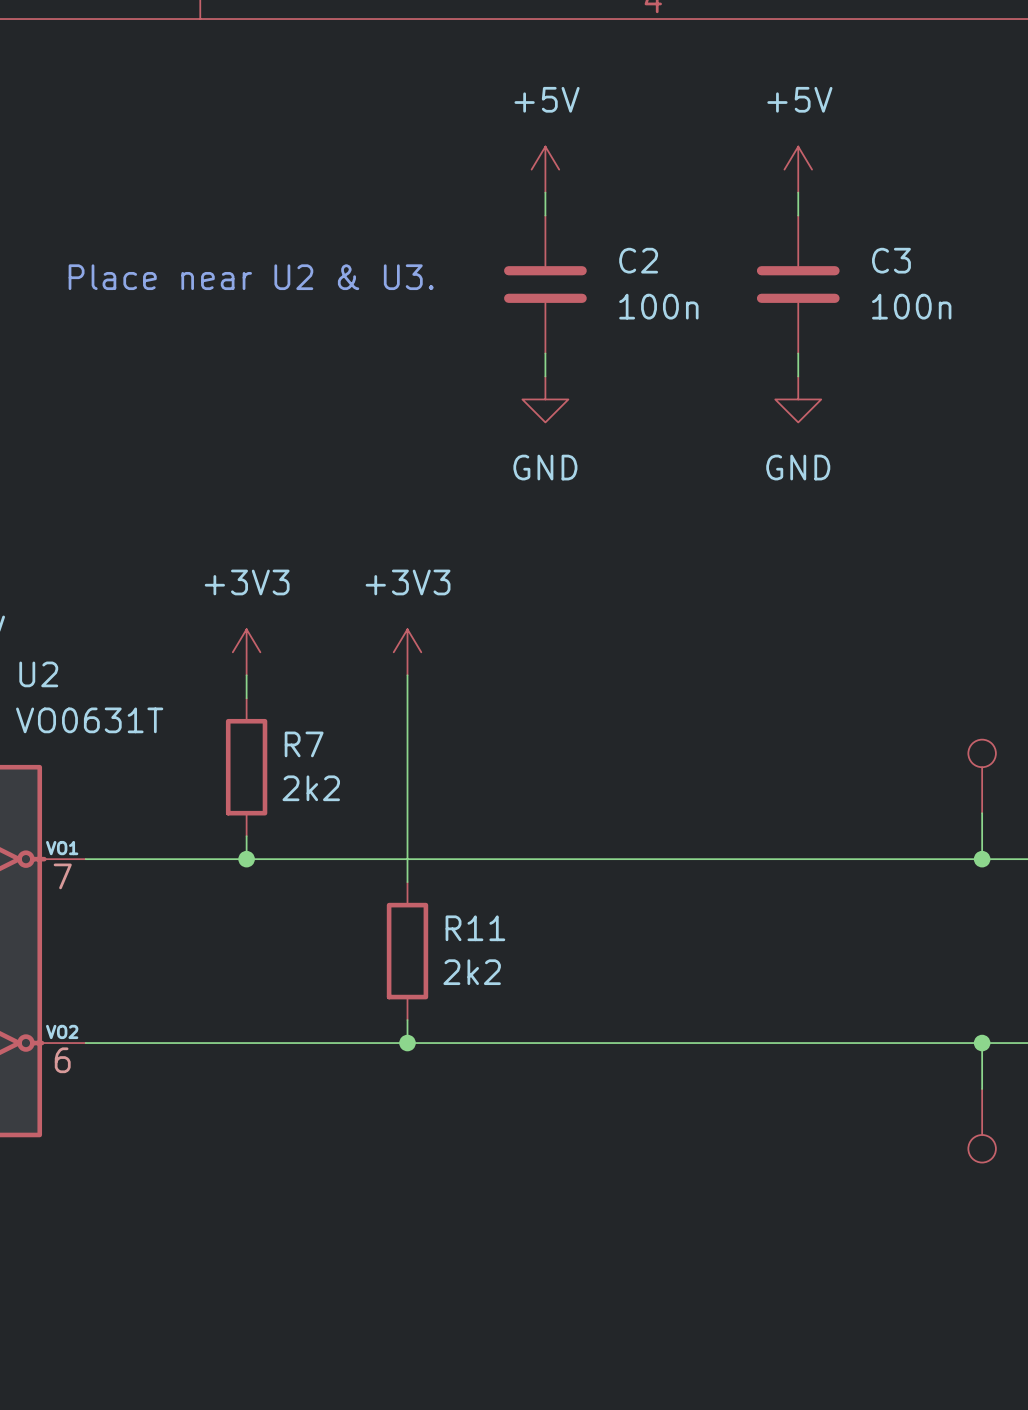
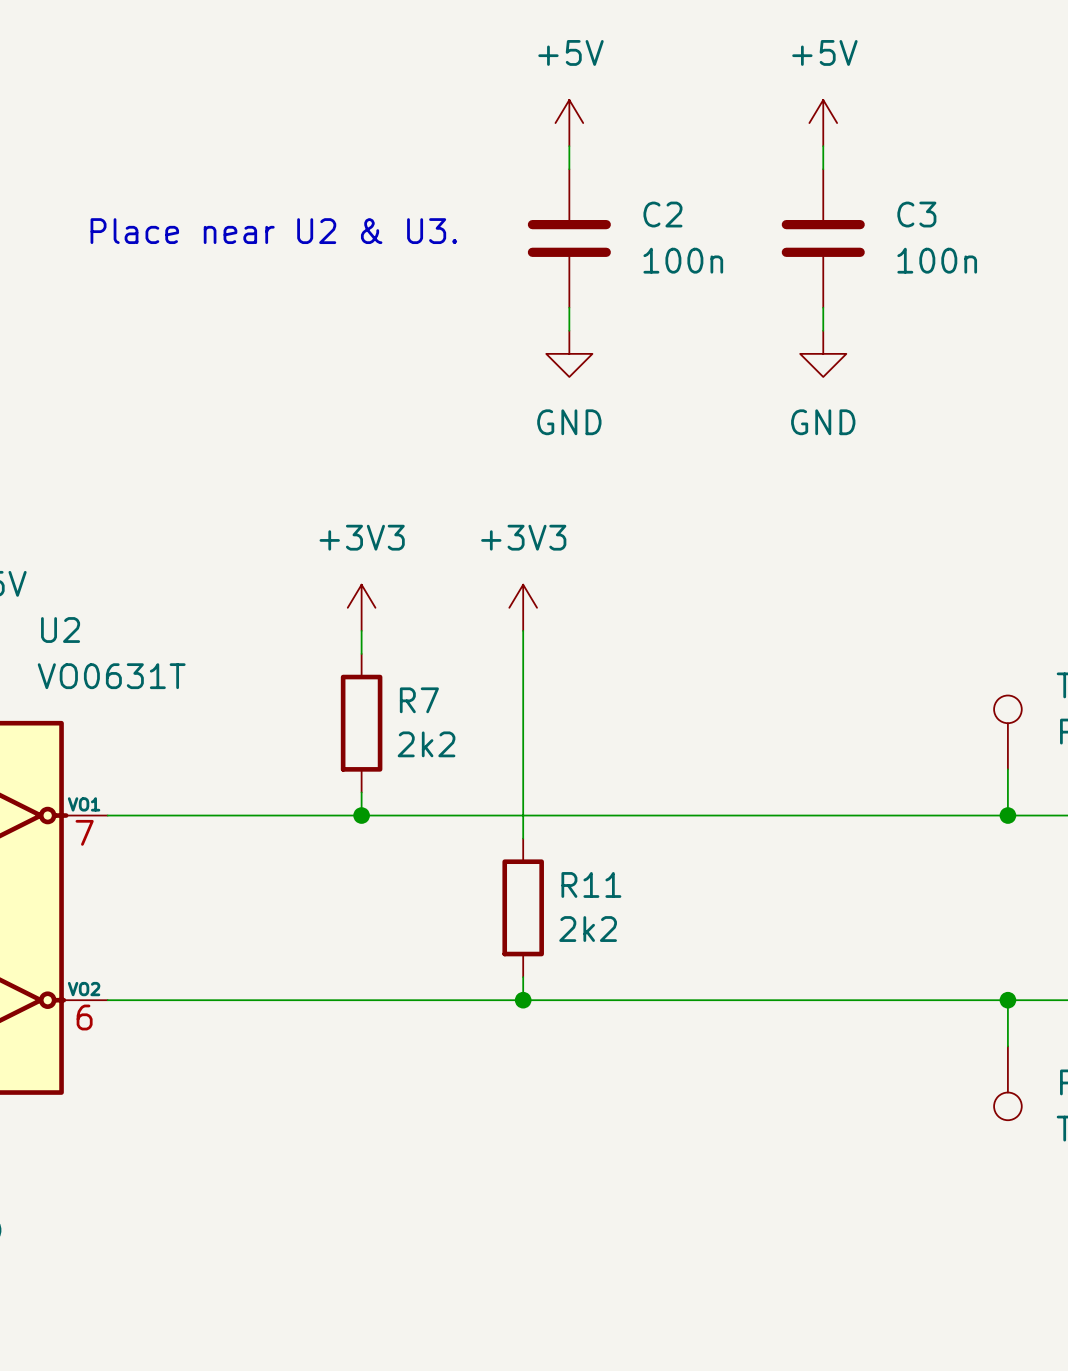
power symbol: +3V3 (246, 652) -> none
power symbol: none -> +3V3 (361, 607)
power symbol: +3V3 (407, 652) -> none
power symbol: none -> +3V3 (523, 607)
wire: (246, 675) (246, 698) -> (361, 630) (361, 653)
wire: (407, 675) (407, 882) -> (523, 630) (523, 838)
R7 position: (246, 767) -> (361, 723)
wire: (246, 836) (246, 859) -> (361, 792) (361, 815)
junction position: (246, 859) -> (361, 815)
R11 position: (407, 951) -> (523, 907)
wire: (407, 1020) (407, 1043) -> (523, 977) (523, 1000)
junction position: (407, 1043) -> (523, 1000)

